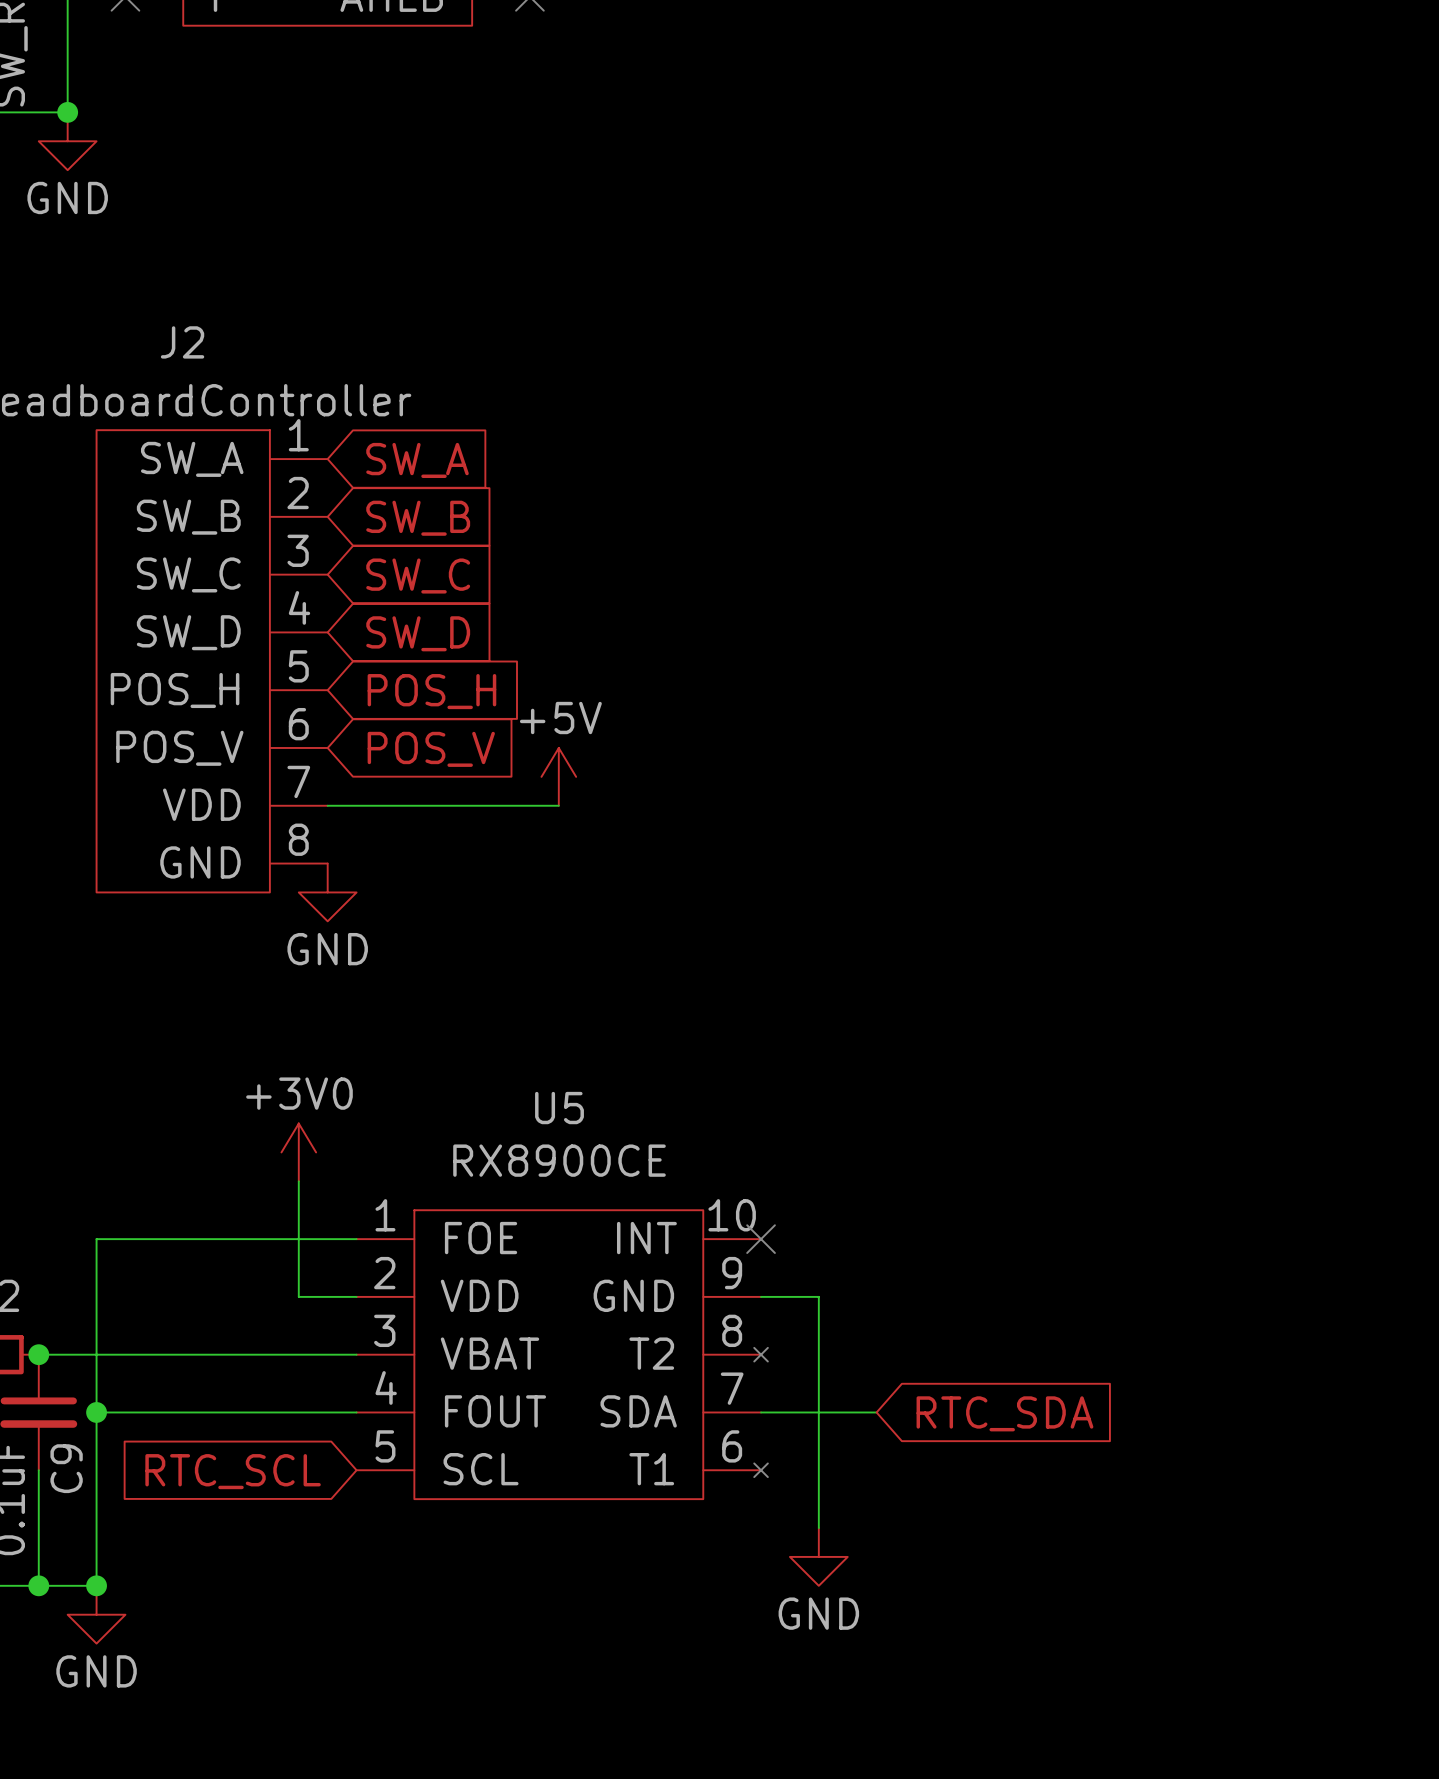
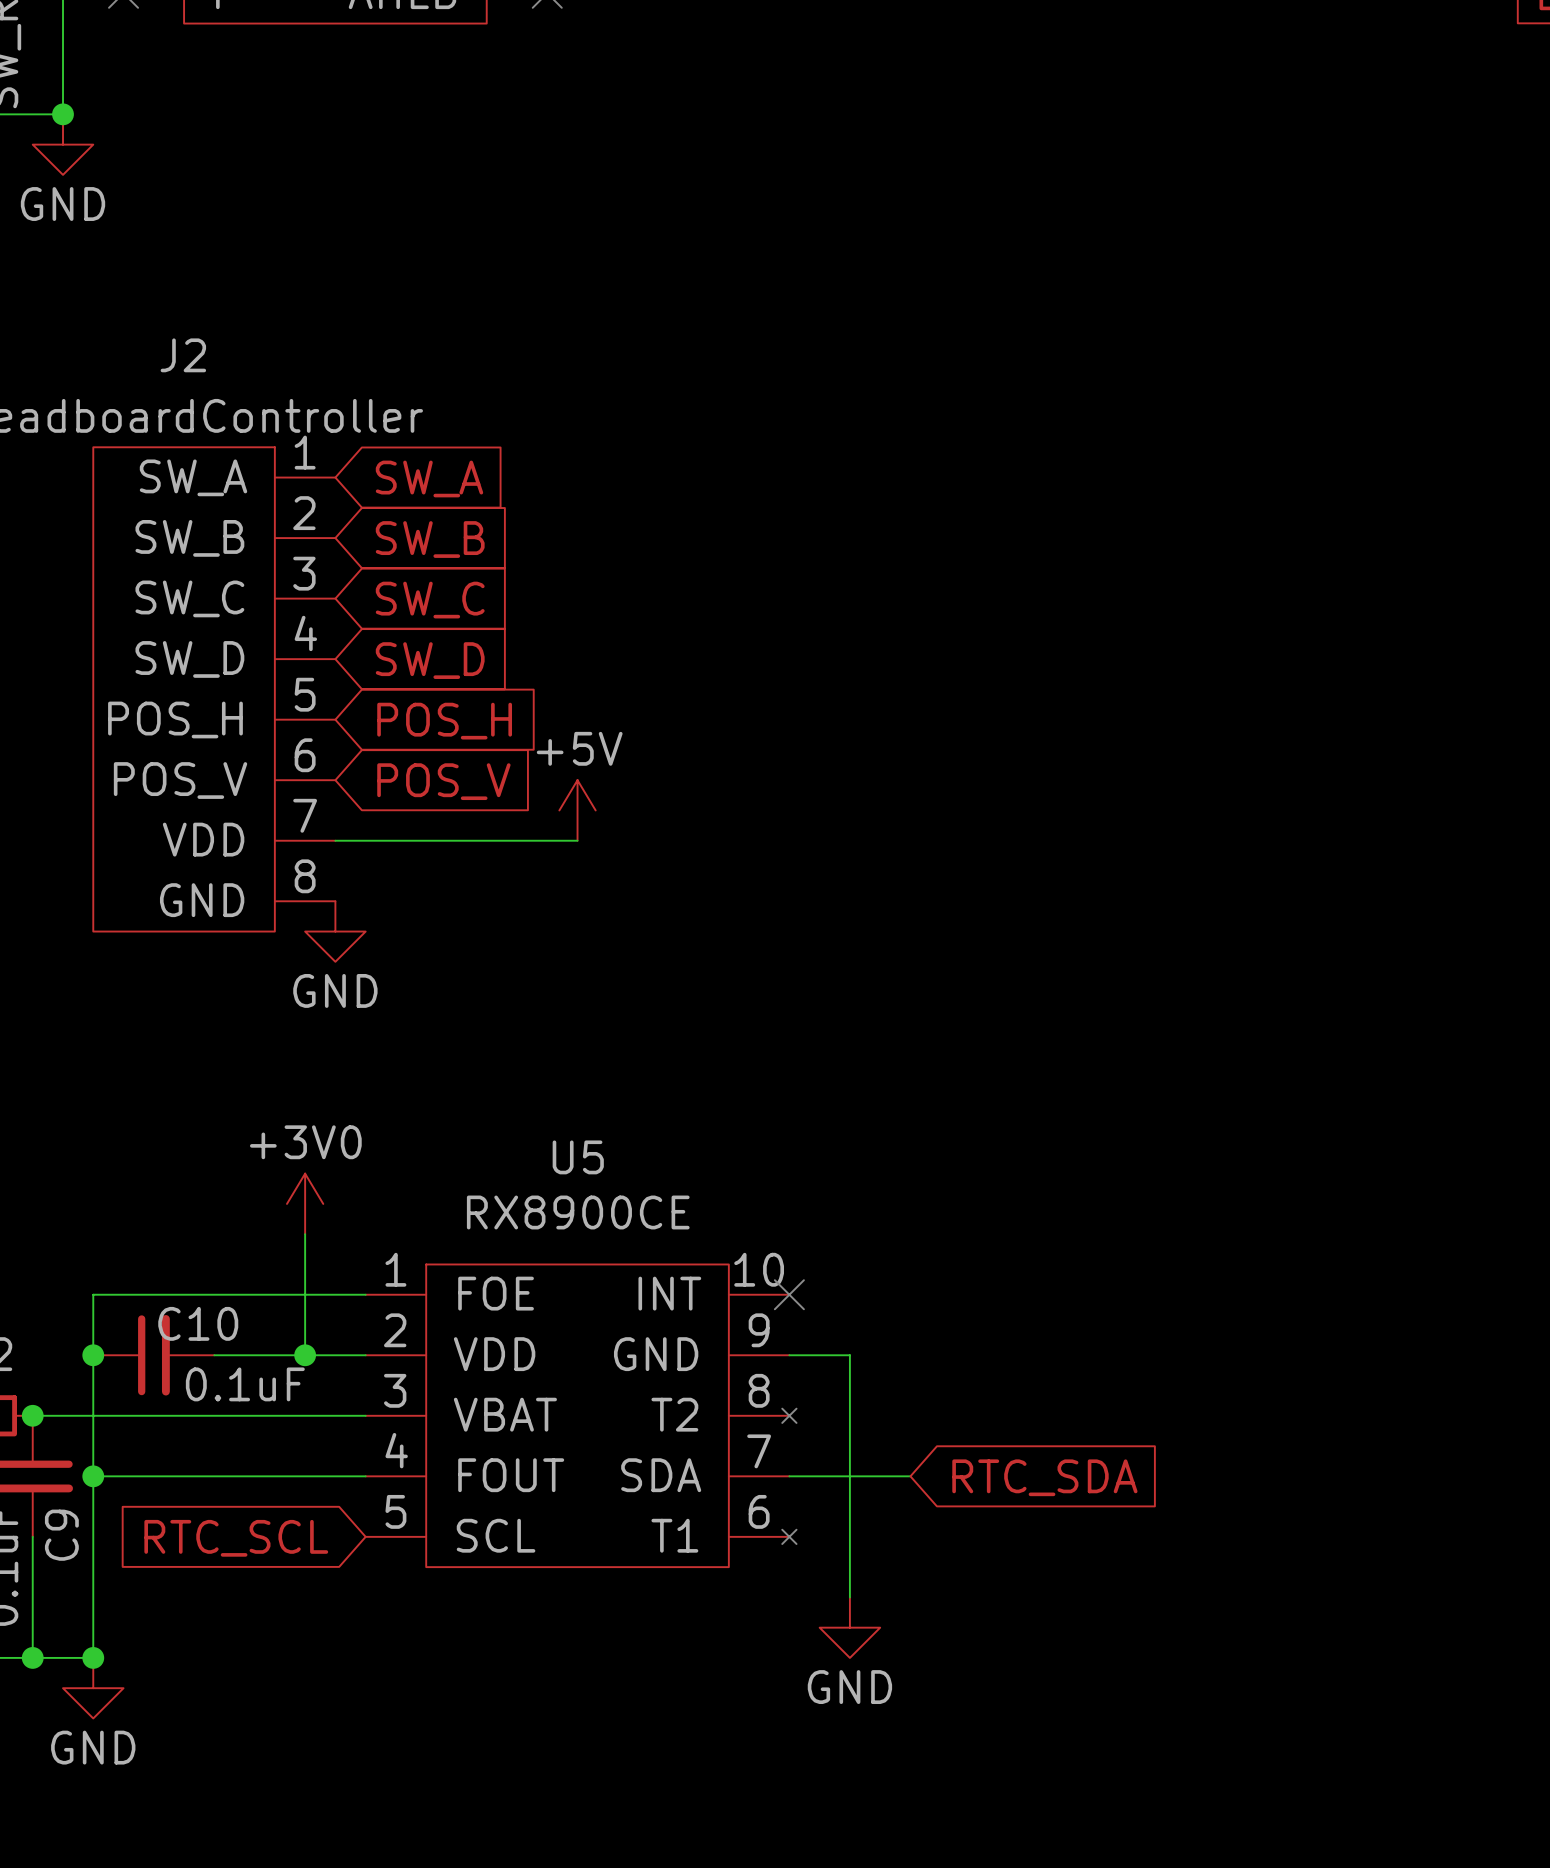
junction: none -> (93, 1355)
C10: none -> 0.1uF (153, 1355)
wire: none -> (214, 1355) (305, 1355)
junction: none -> (305, 1355)

